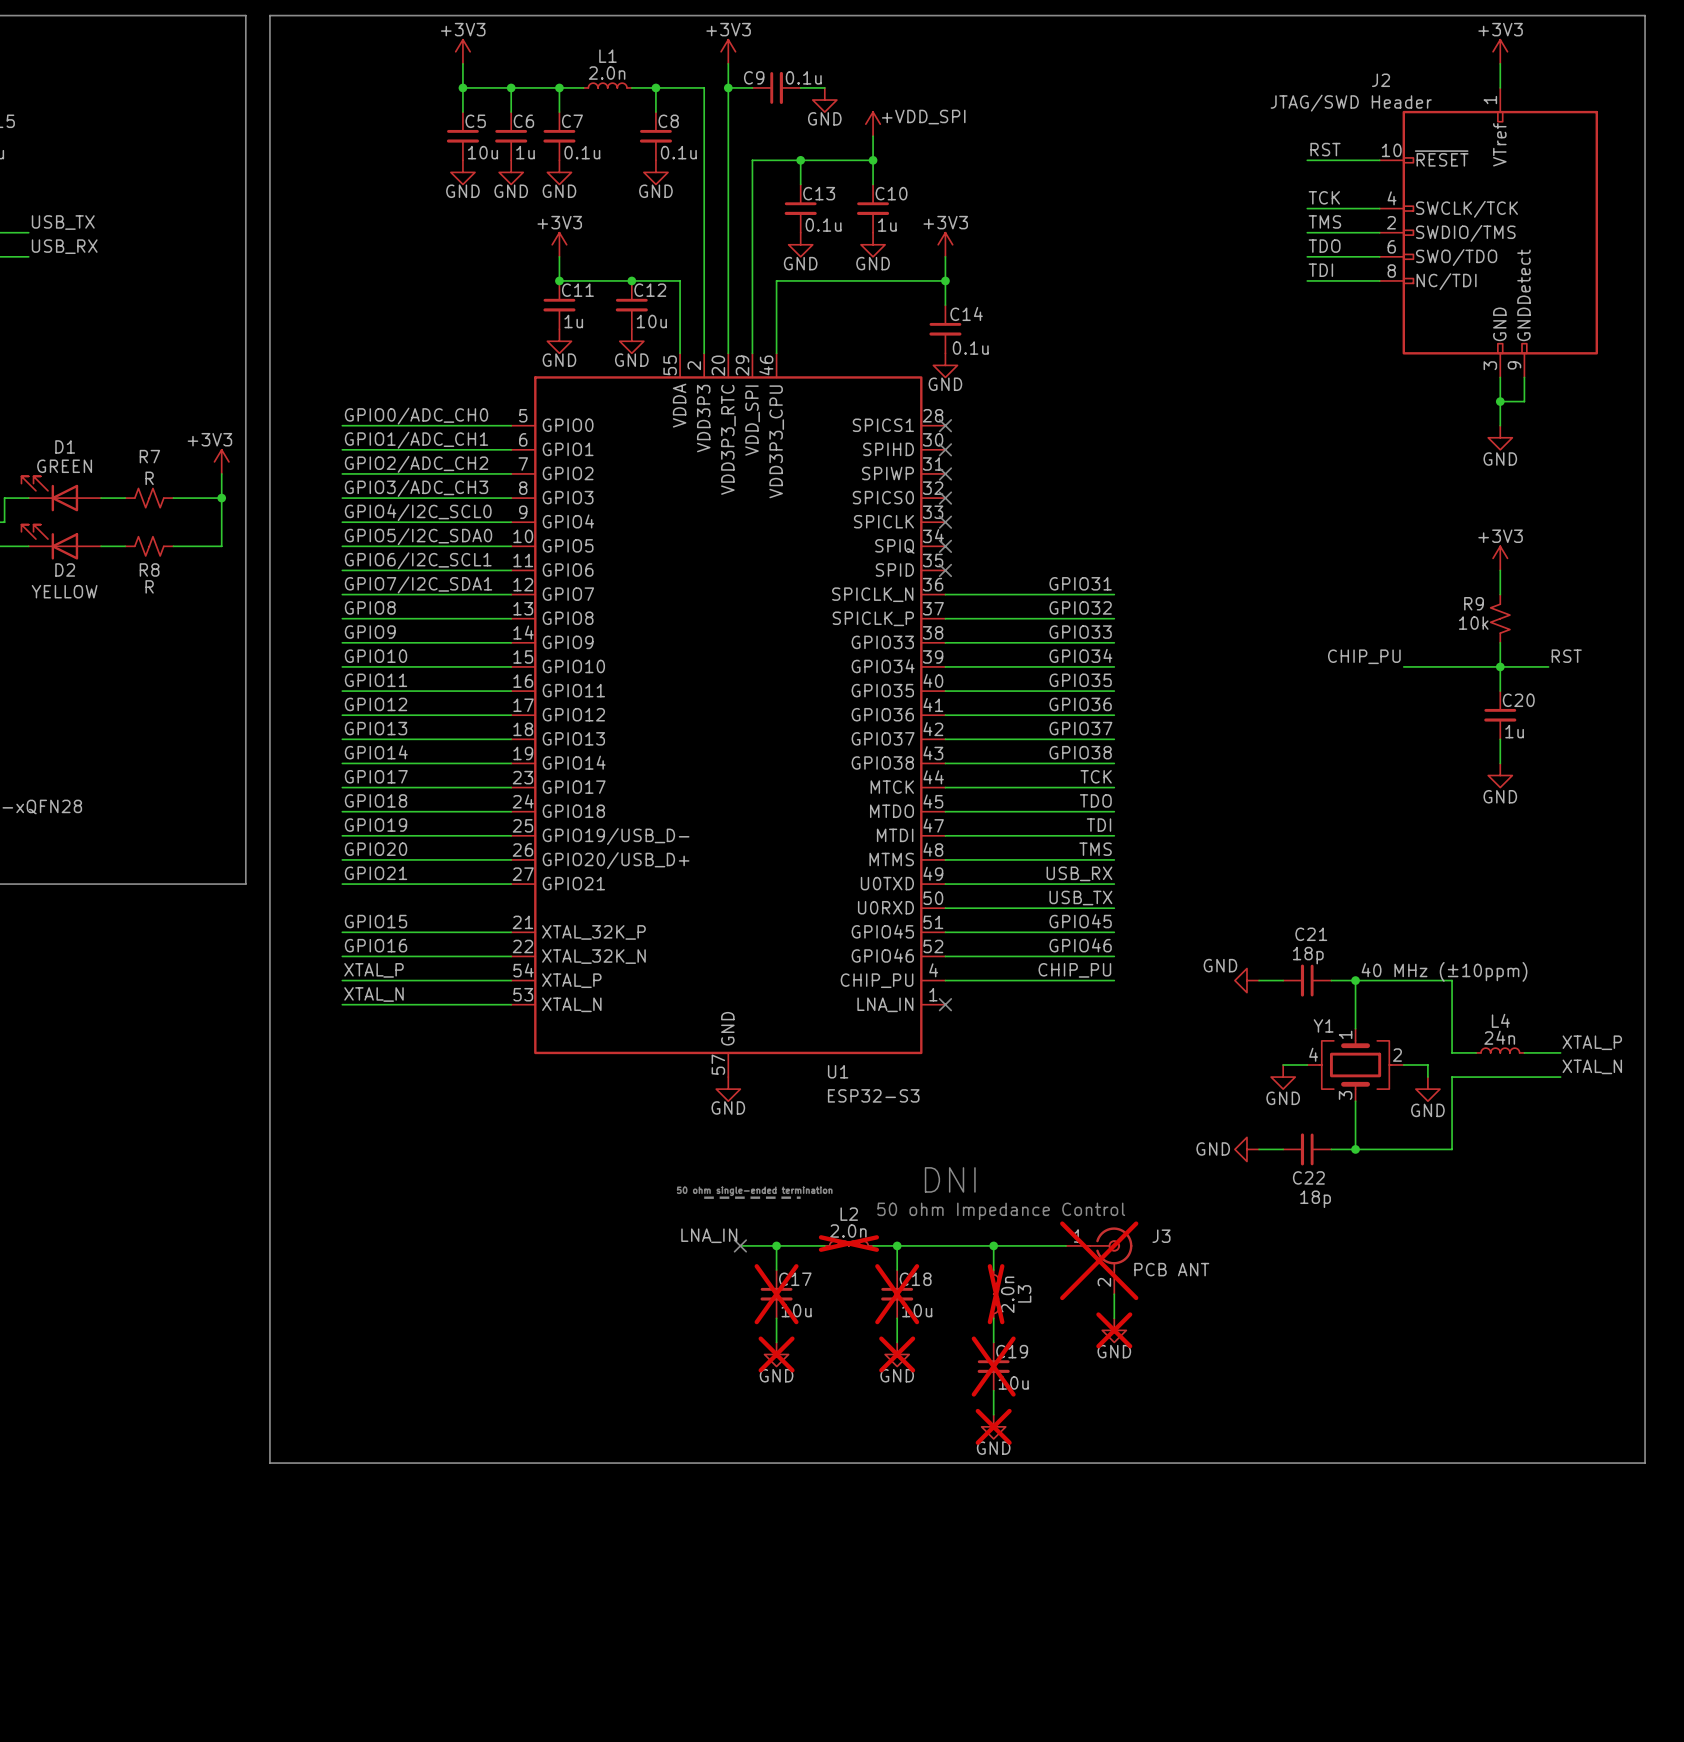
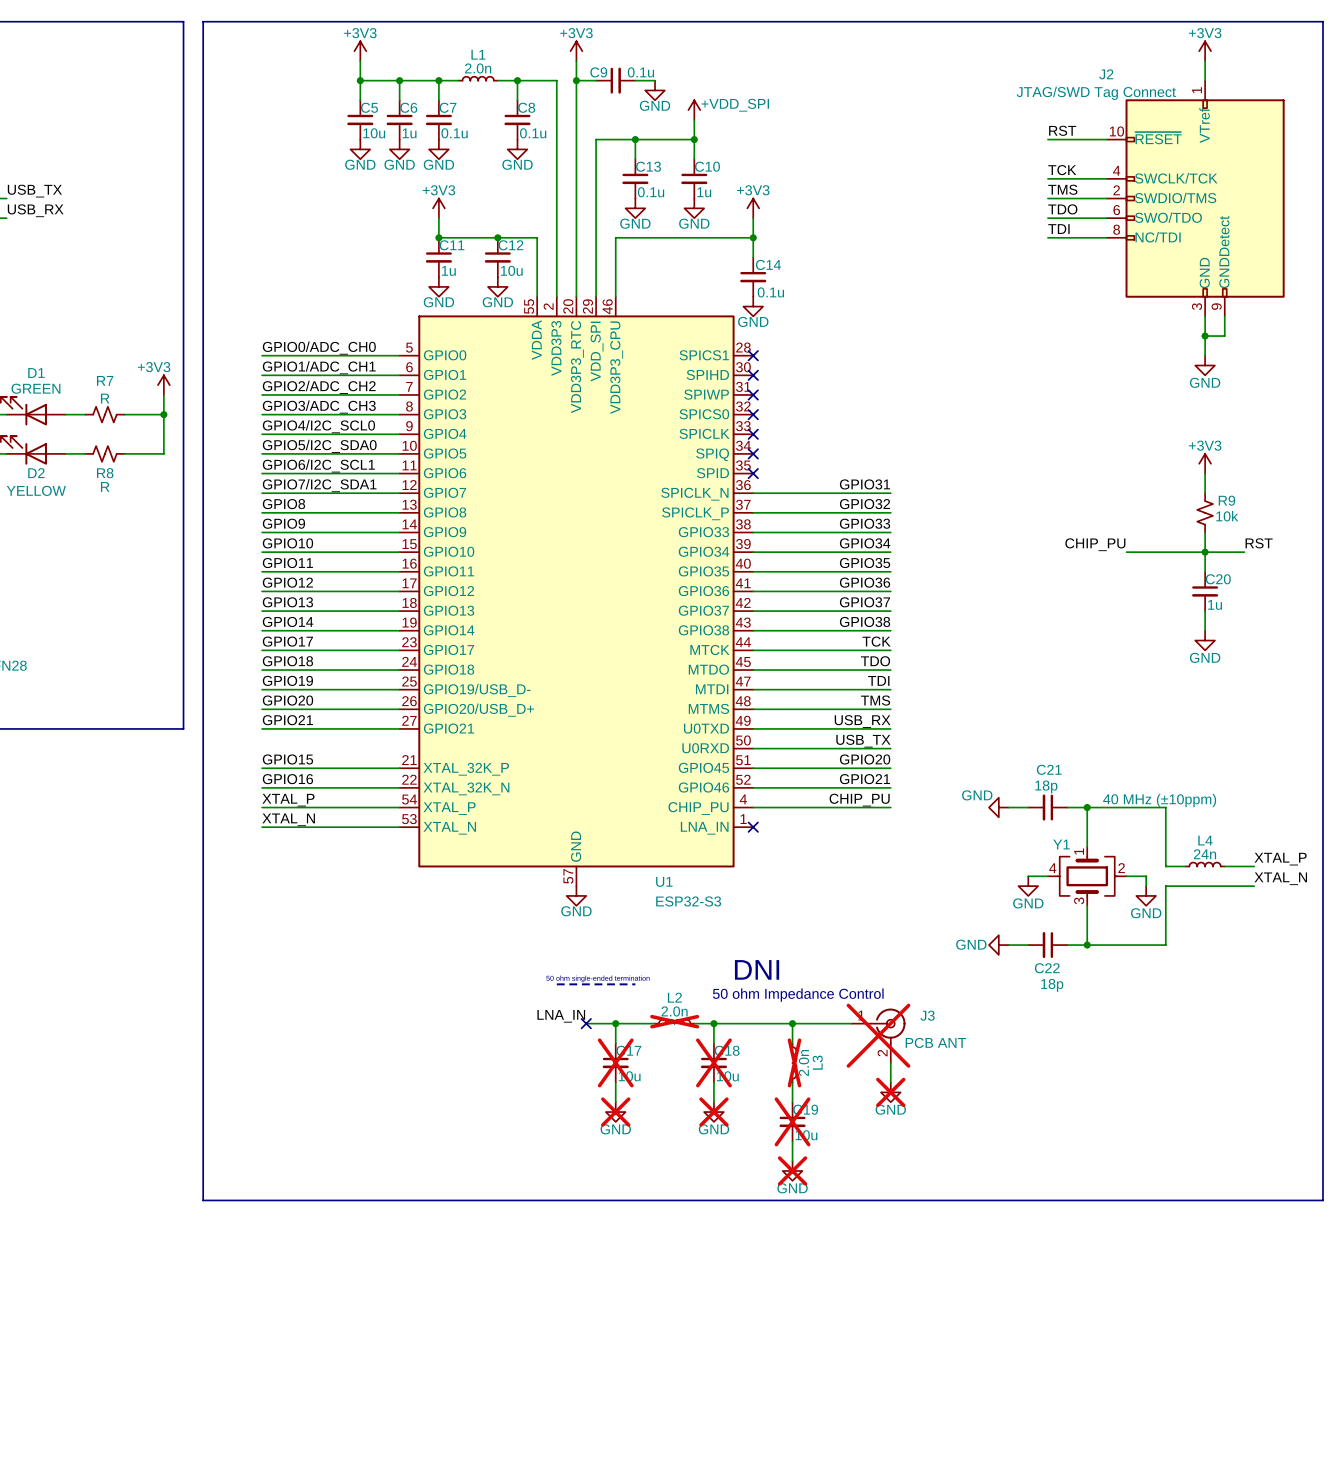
J2 value: JTAG/SWD Header (1351, 103) -> JTAG/SWD Tag Connect (1096, 93)
R9 flip: as is (1500, 618) -> left-right (1205, 512)
label: GPIO45 (1080, 921) -> GPIO20 (865, 759)
label: GPIO46 (1080, 945) -> GPIO21 (864, 779)

